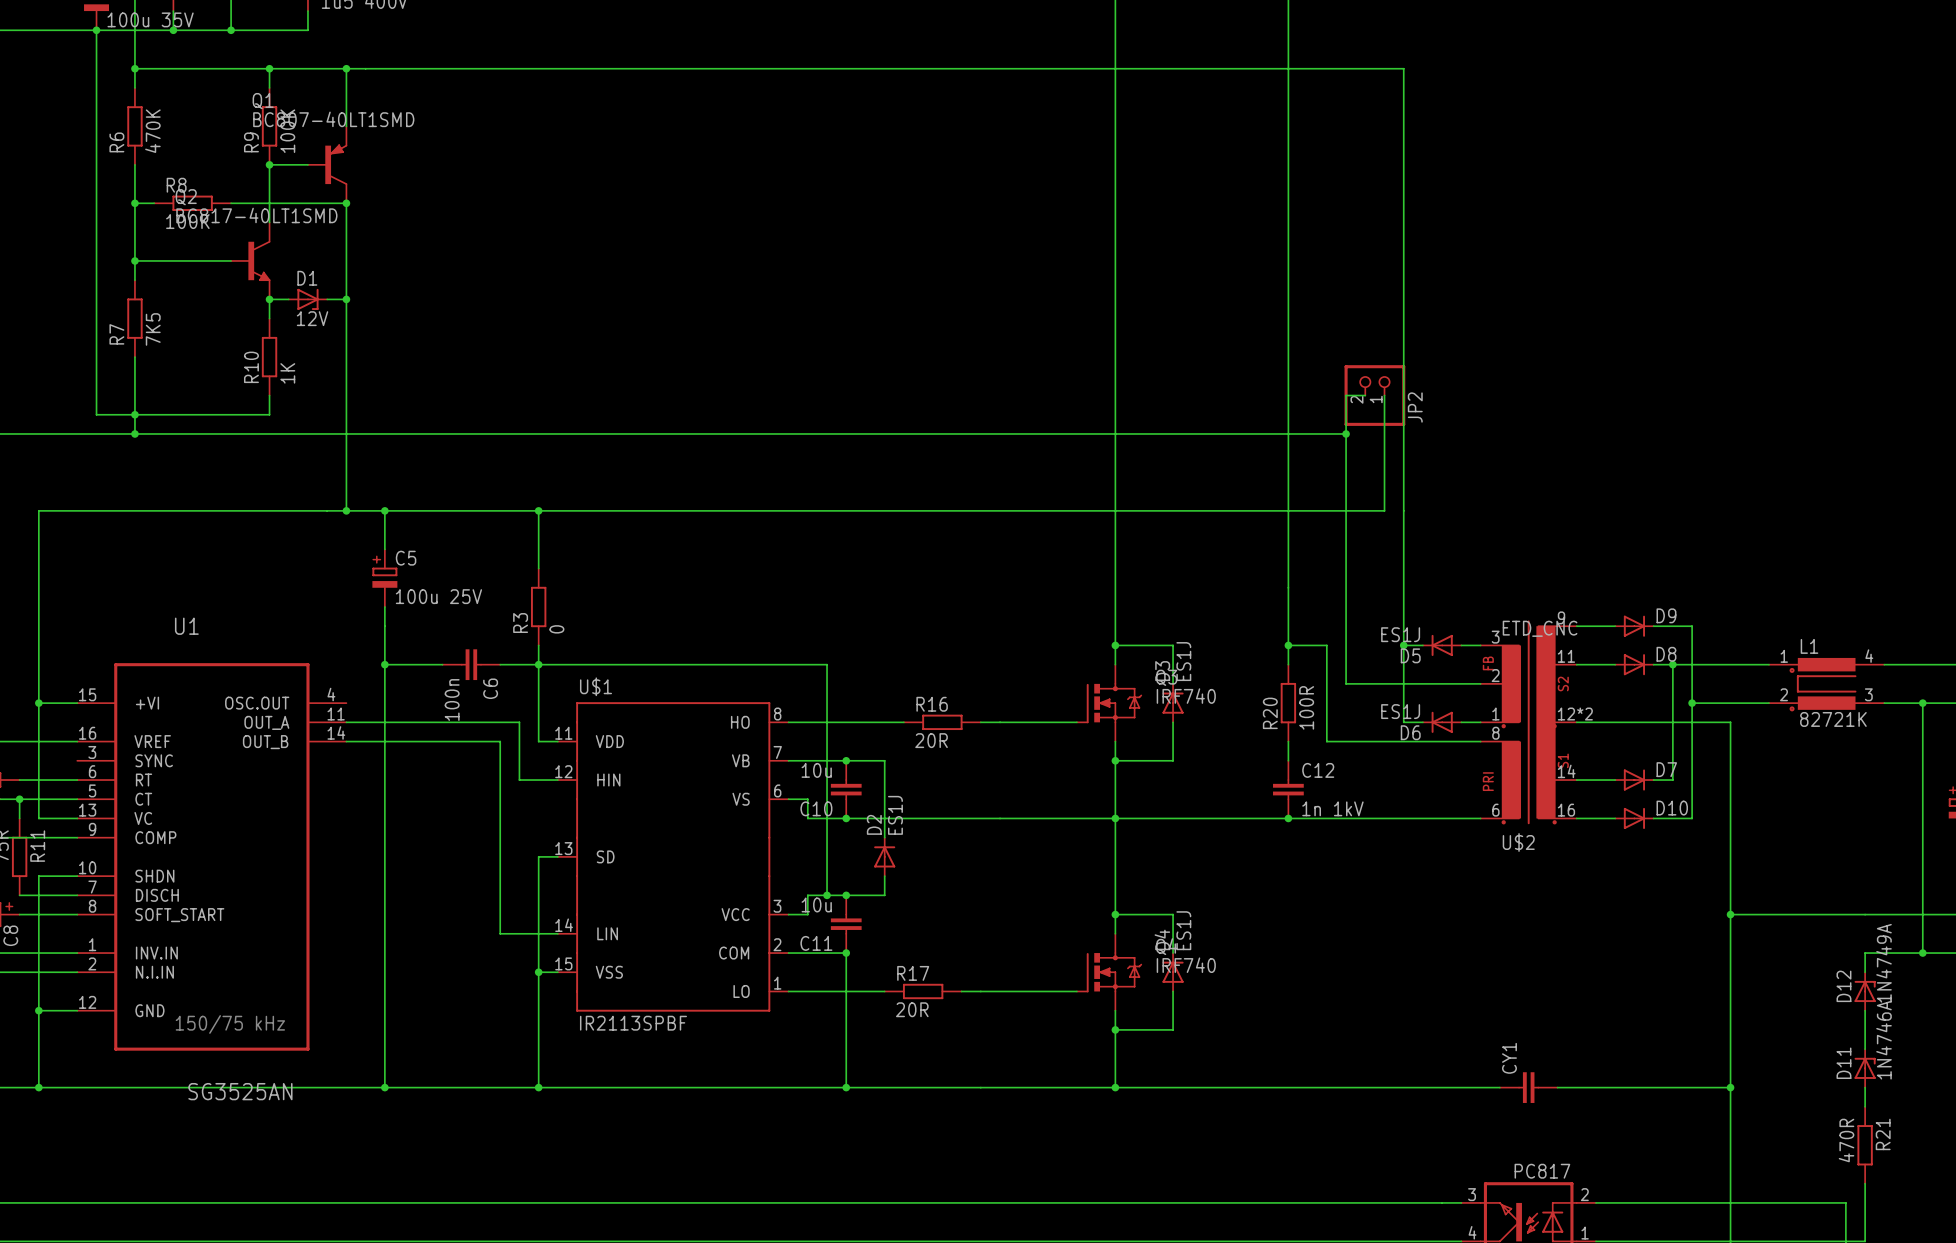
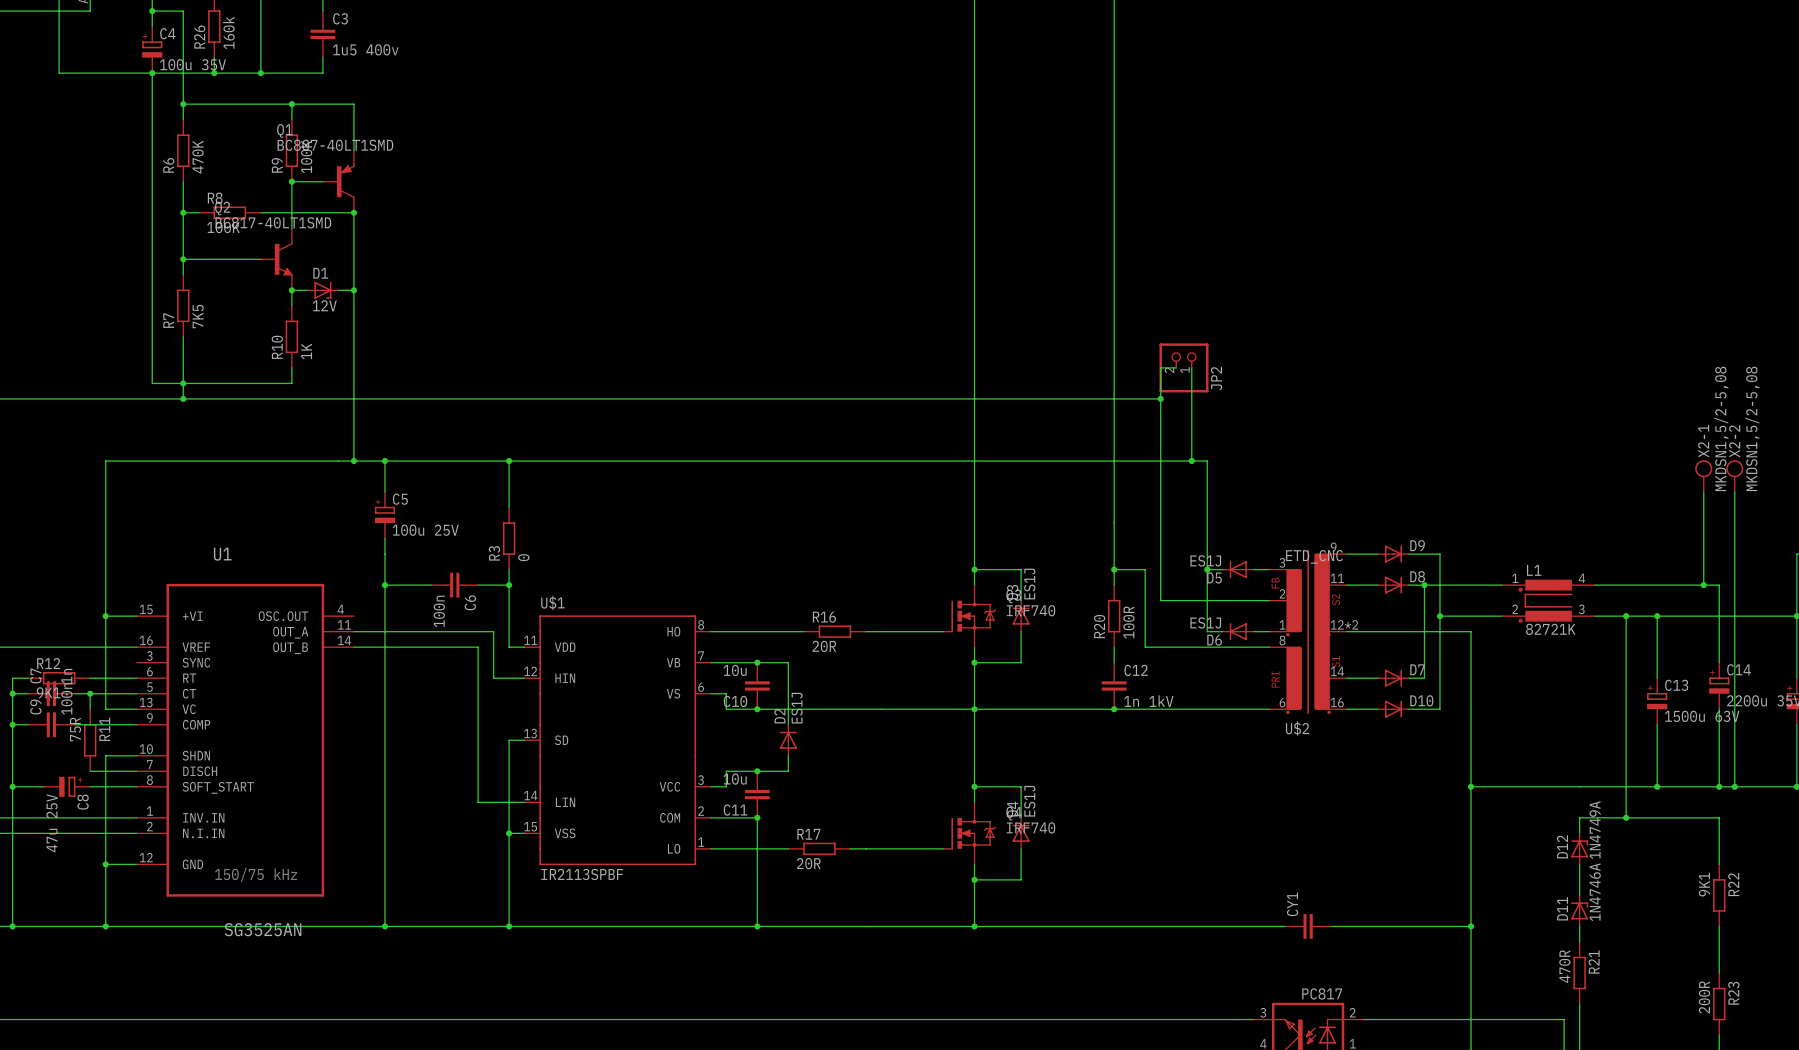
wire: (346, 68) (1403, 68) (1403, 510) -> (1191, 461) (1207, 461)
junction: (346, 68) -> none
junction: none -> (1191, 461)
wire: (538, 664) (827, 664) (827, 895) -> none
junction: (827, 895) -> none

